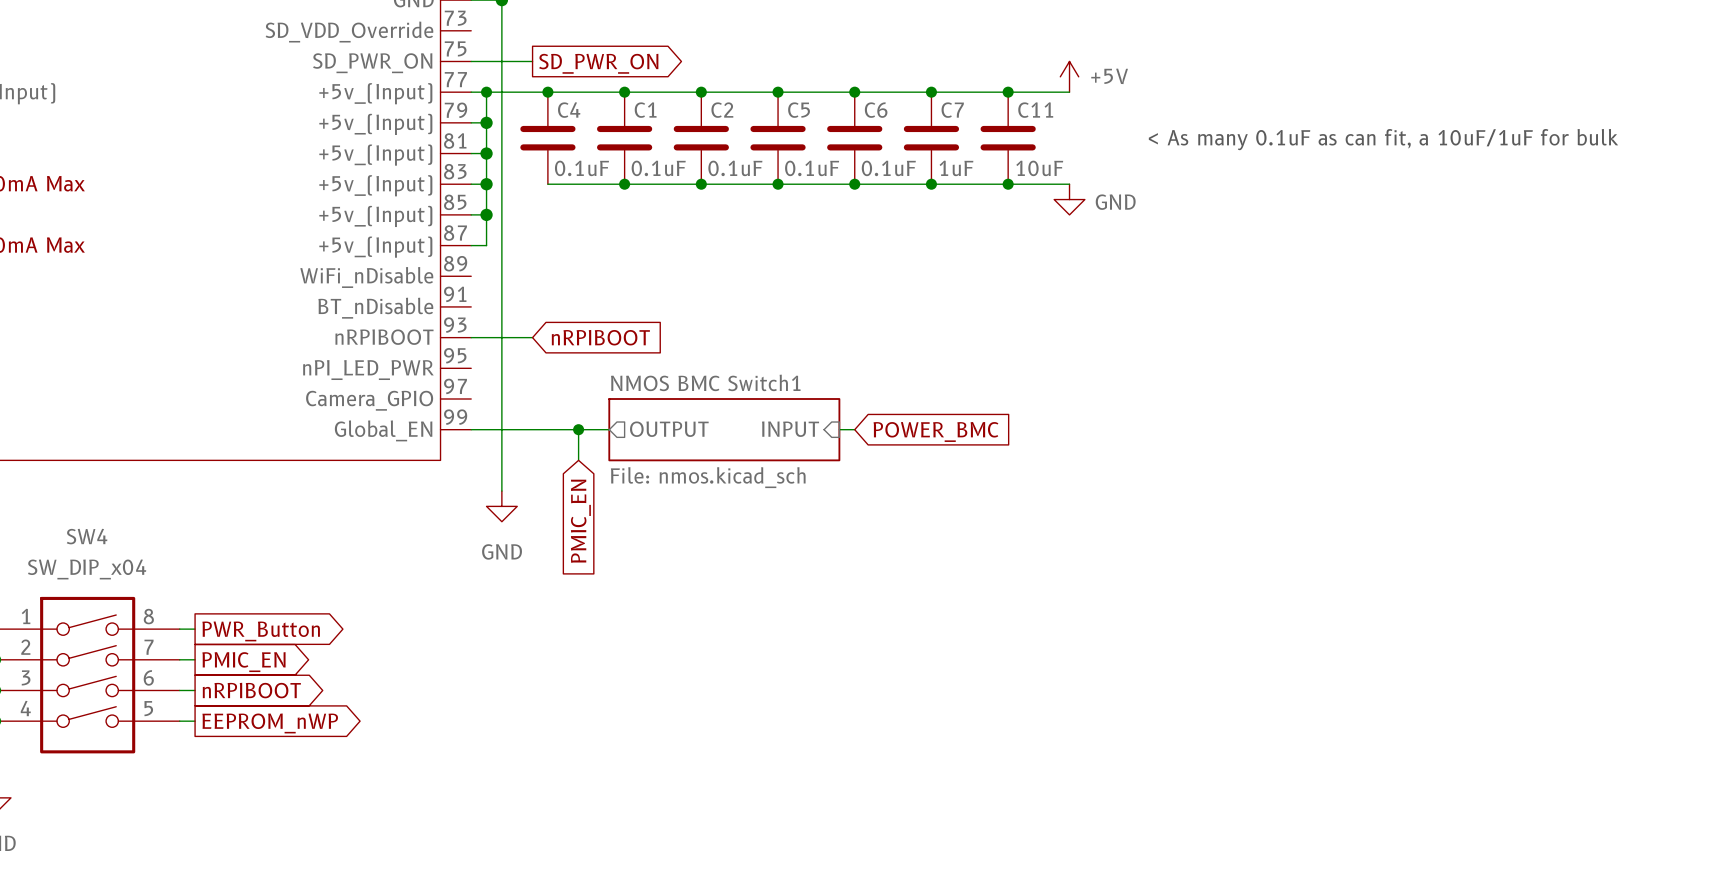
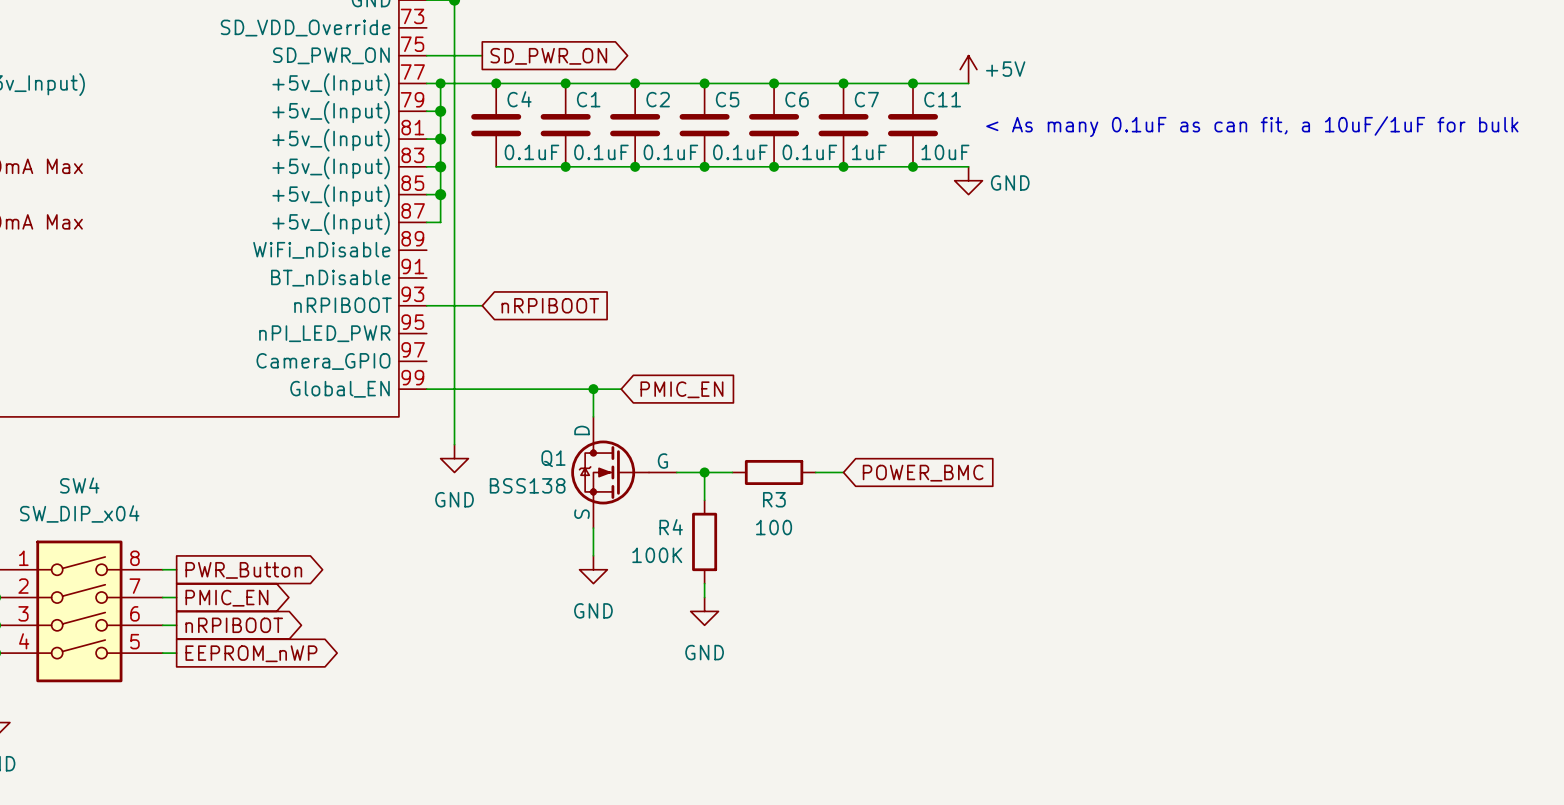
wire: (578, 429) (578, 460) -> (593, 389) (593, 416)
junction: (578, 429) -> none
wire: none -> (551, 389) (621, 389)
junction: none -> (593, 389)
sheet pin: OUTPUT (669, 429) -> none
sheet NMOS BMC Switch1: File: nmos.kicad_sch (724, 429) -> none
sheet pin: INPUT (790, 429) -> none
wire: (839, 429) (854, 429) -> none
global label position: POWER_BMC (935, 431) -> POWER_BMC (923, 473)
global label rotation: 0° (580, 521) -> 90° counterclockwise (681, 389)
global label position: PMIC_EN (580, 521) -> PMIC_EN (681, 389)
Q1: none -> BSS138 (624, 472)
wire: none -> (676, 472) (732, 472)
wire: none -> (704, 472) (704, 500)
junction: none -> (704, 472)
R3: none -> 100 (774, 472)
wire: none -> (815, 472) (843, 472)
wire: none -> (593, 528) (593, 555)
R4: none -> 100K (704, 541)
power symbol: none -> GND (593, 569)
wire: none -> (704, 583) (704, 597)
power symbol: none -> GND (704, 611)

